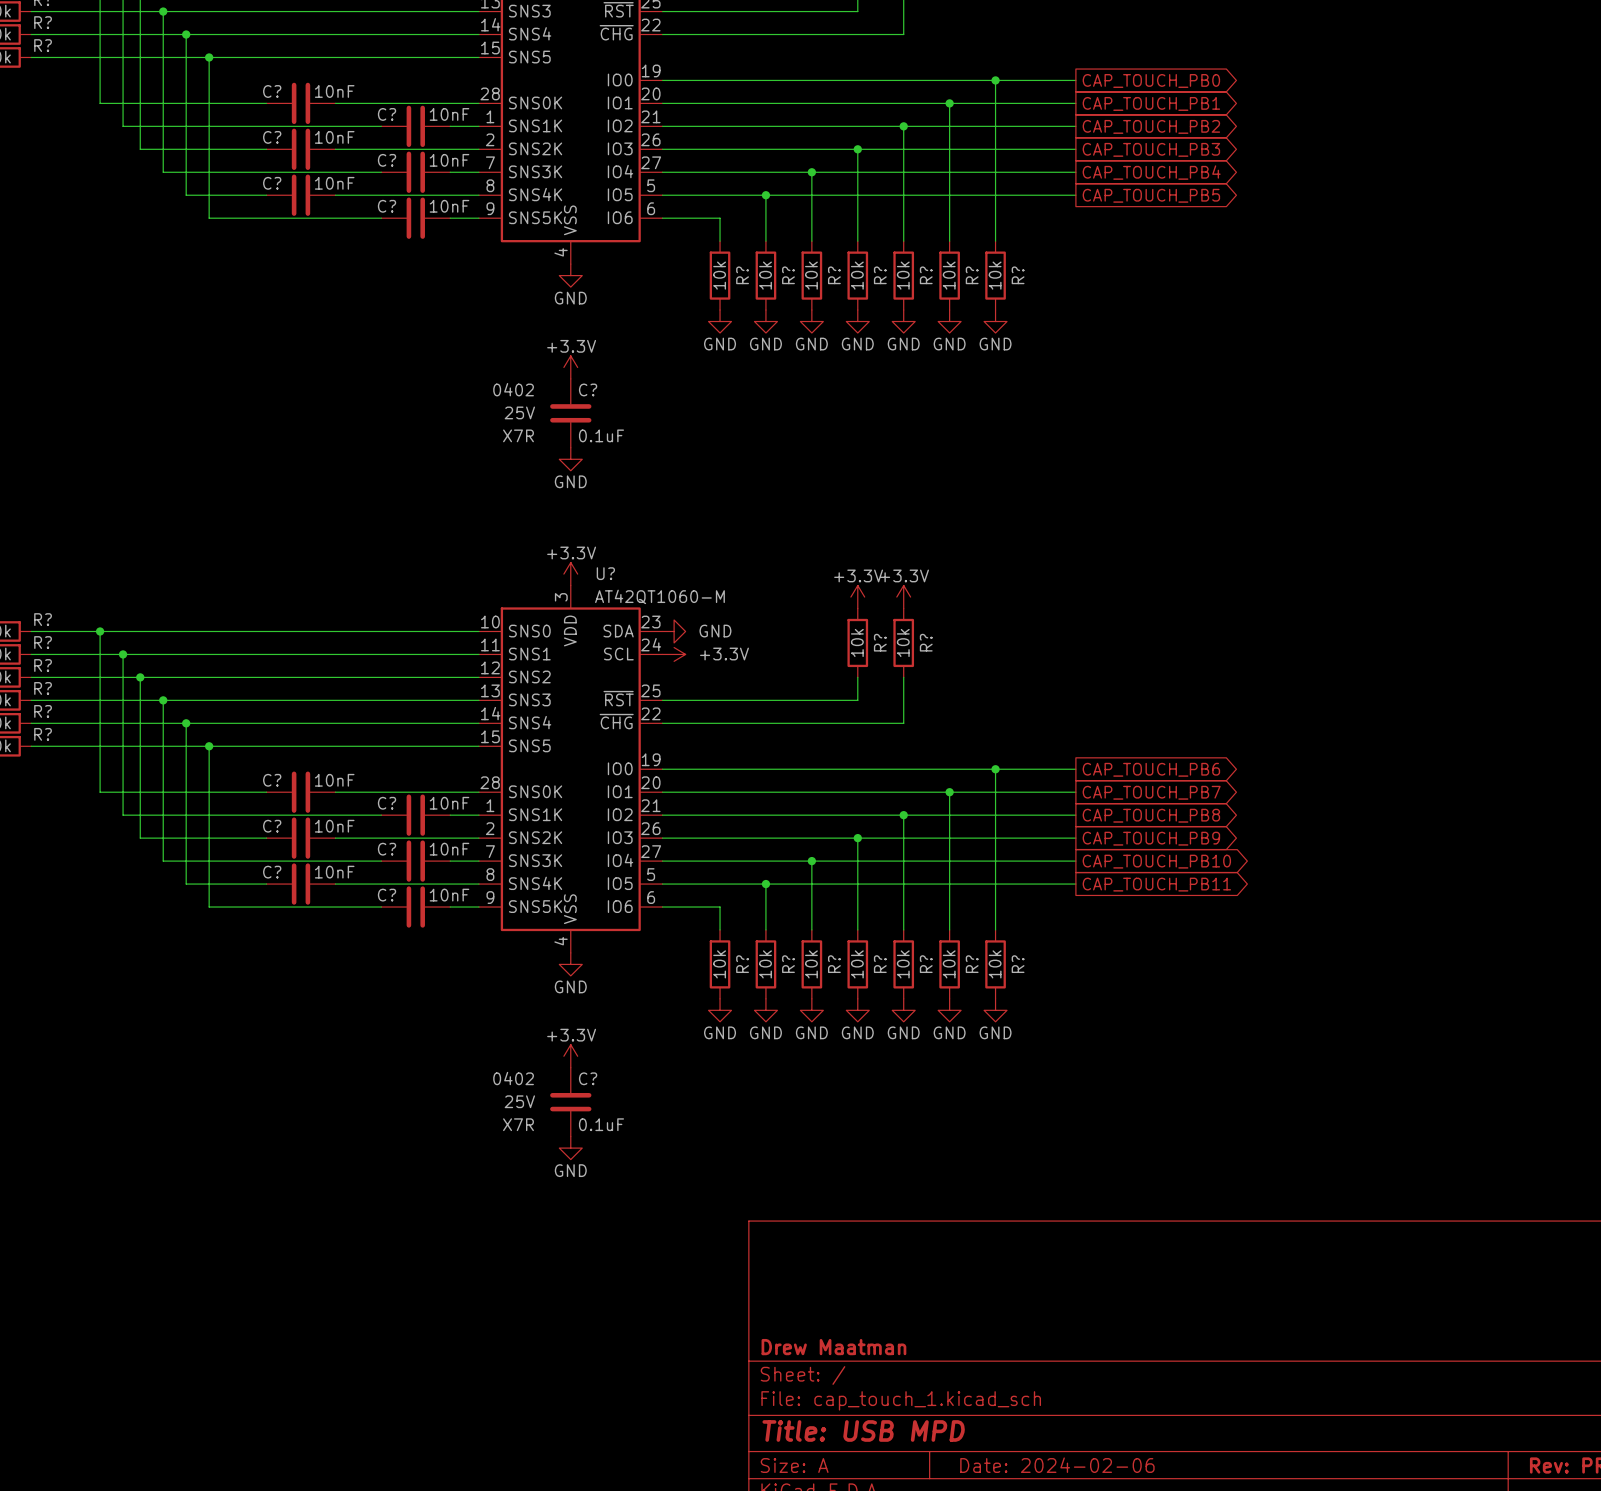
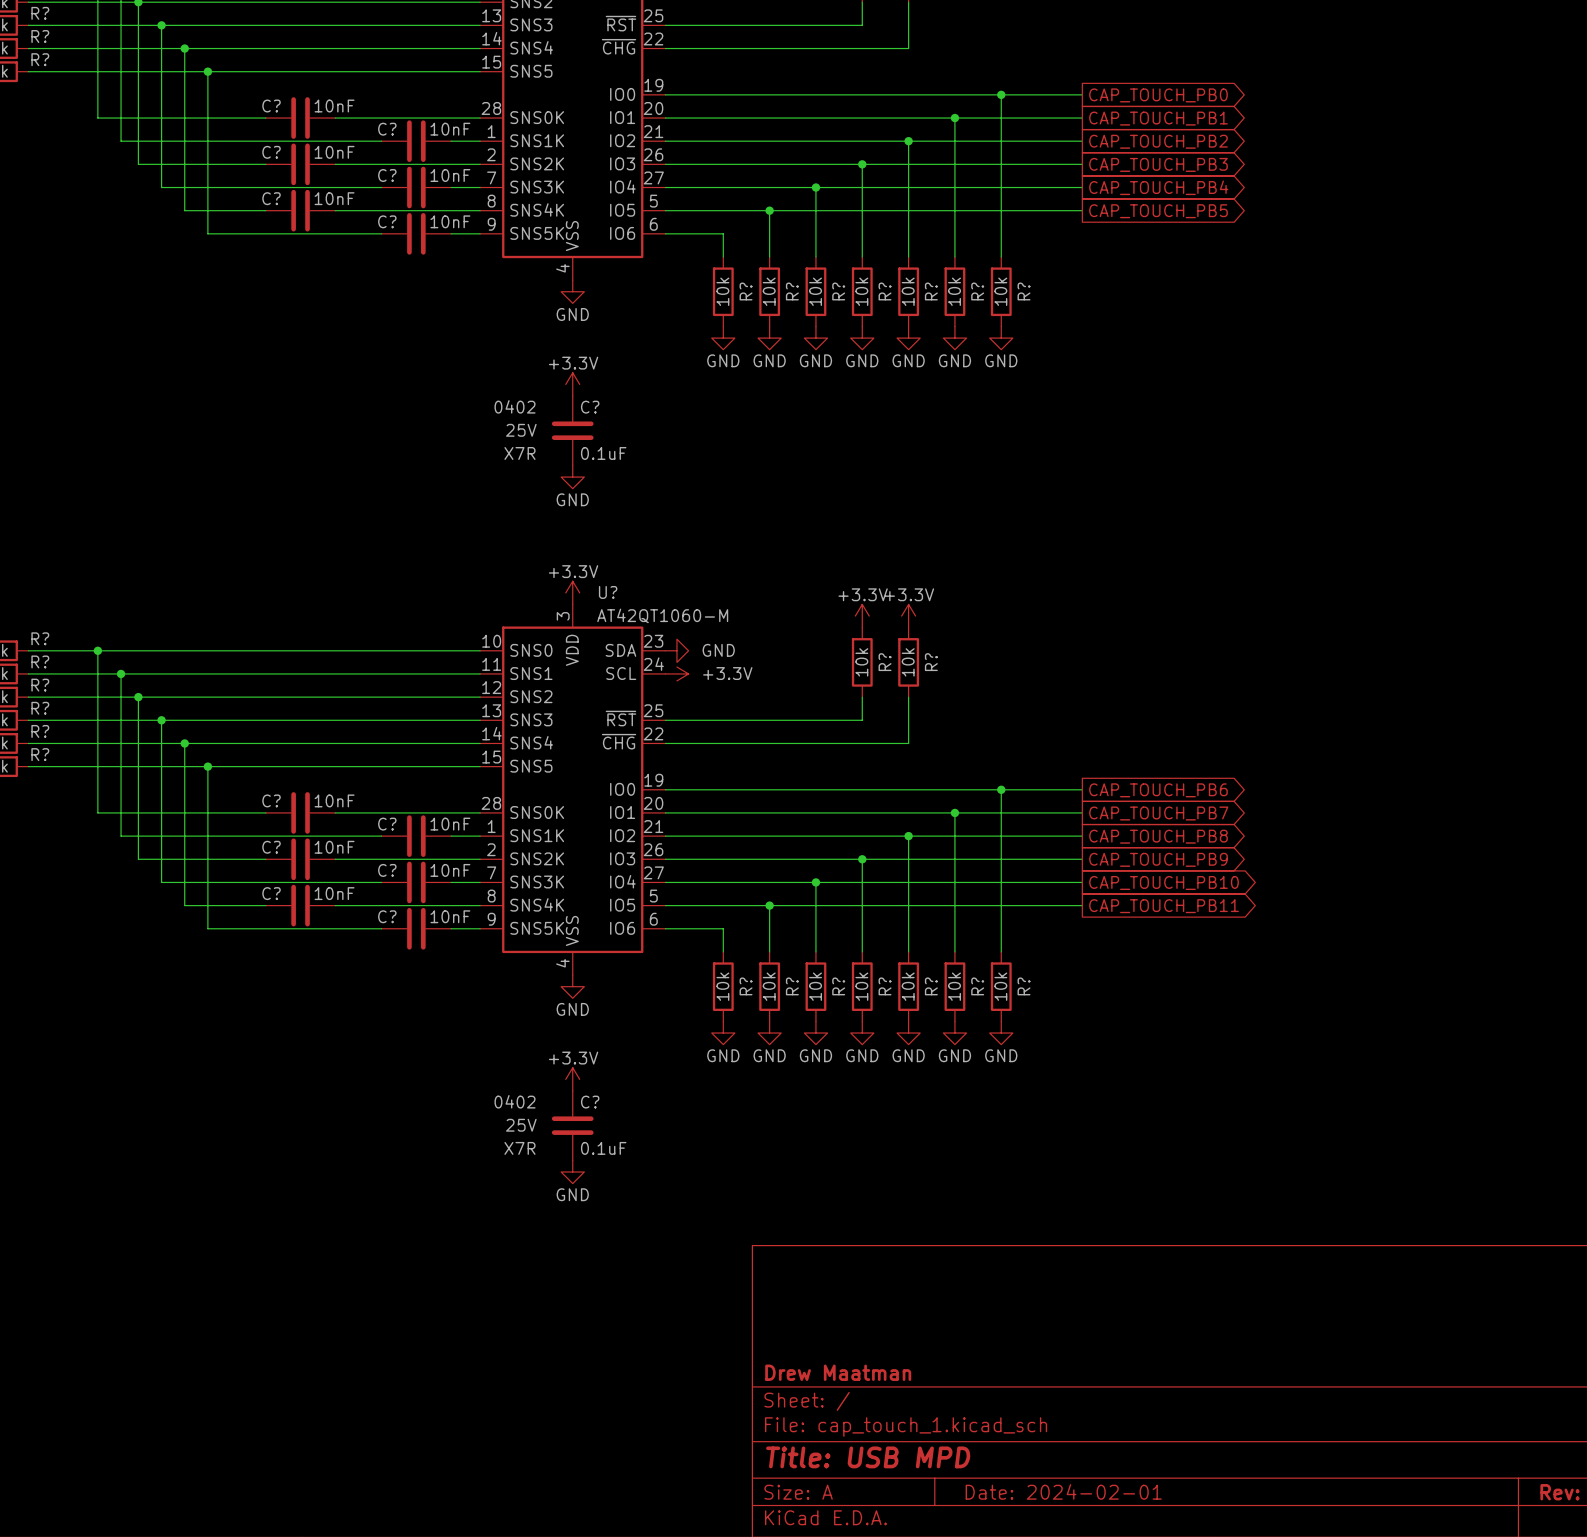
title block: Date: 2024-02-06 (1057, 1465) -> Date: 2024-02-01 (1063, 1491)

